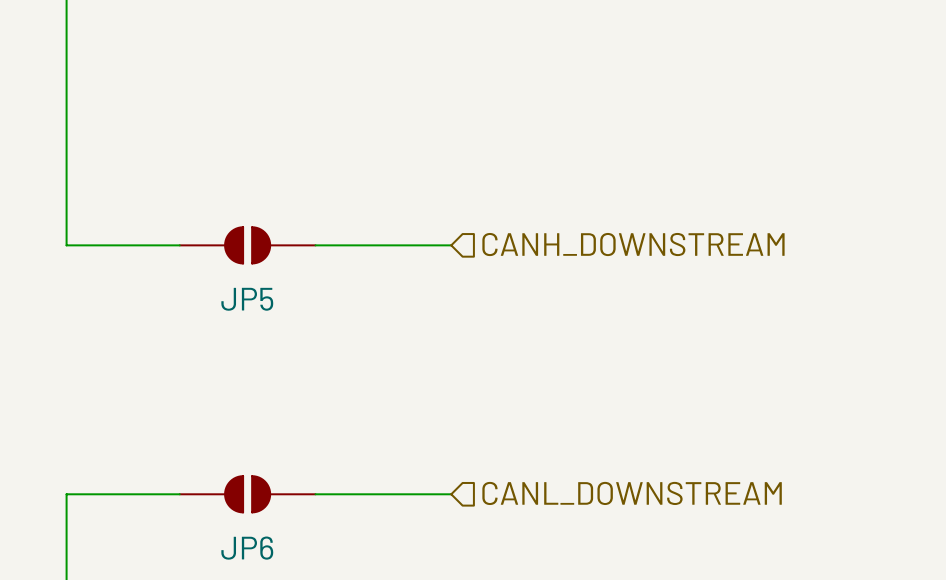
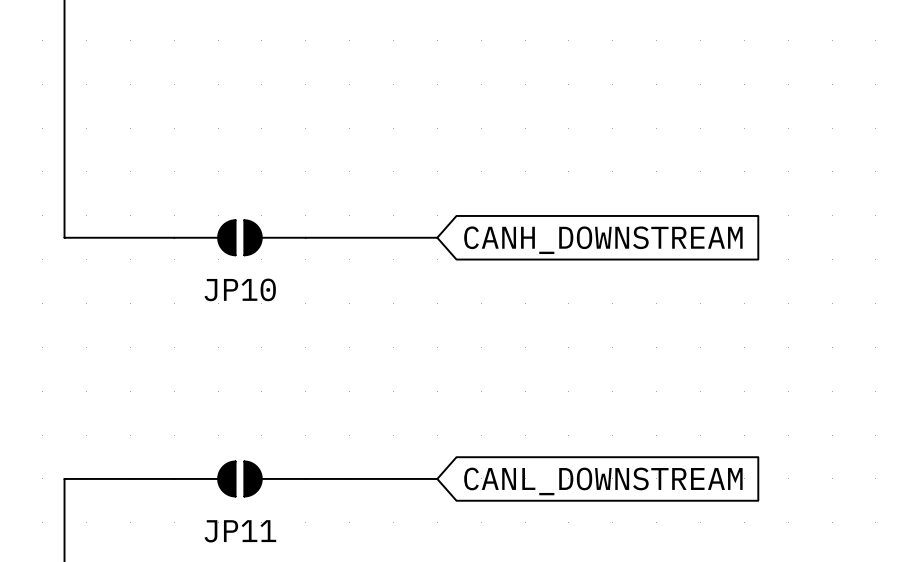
hierarchical label: CANH_DOWNSTREAM (633, 244) -> none
global label: none -> CANH_DOWNSTREAM (603, 240)
JP5 name: JP5 (247, 299) -> JP10 (240, 289)
hierarchical label: CANL_DOWNSTREAM (632, 493) -> none
global label: none -> CANL_DOWNSTREAM (603, 481)
JP6 name: JP6 (247, 548) -> JP11 (240, 531)

